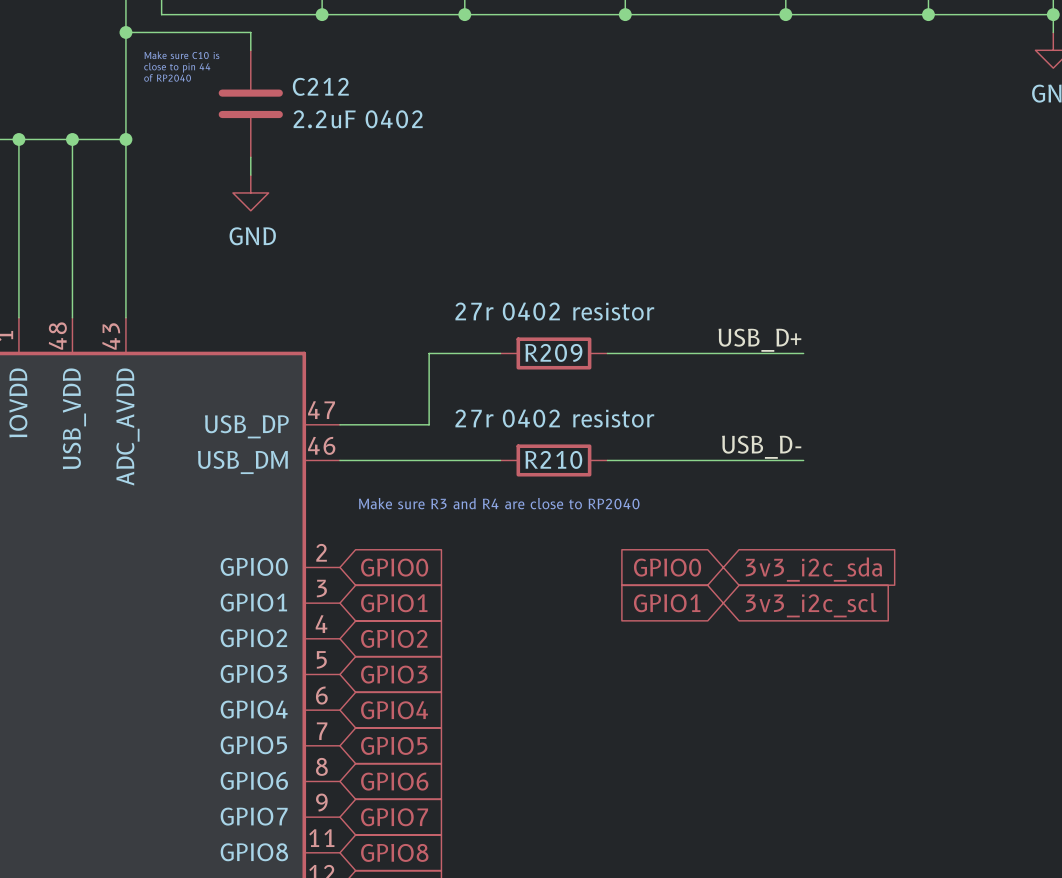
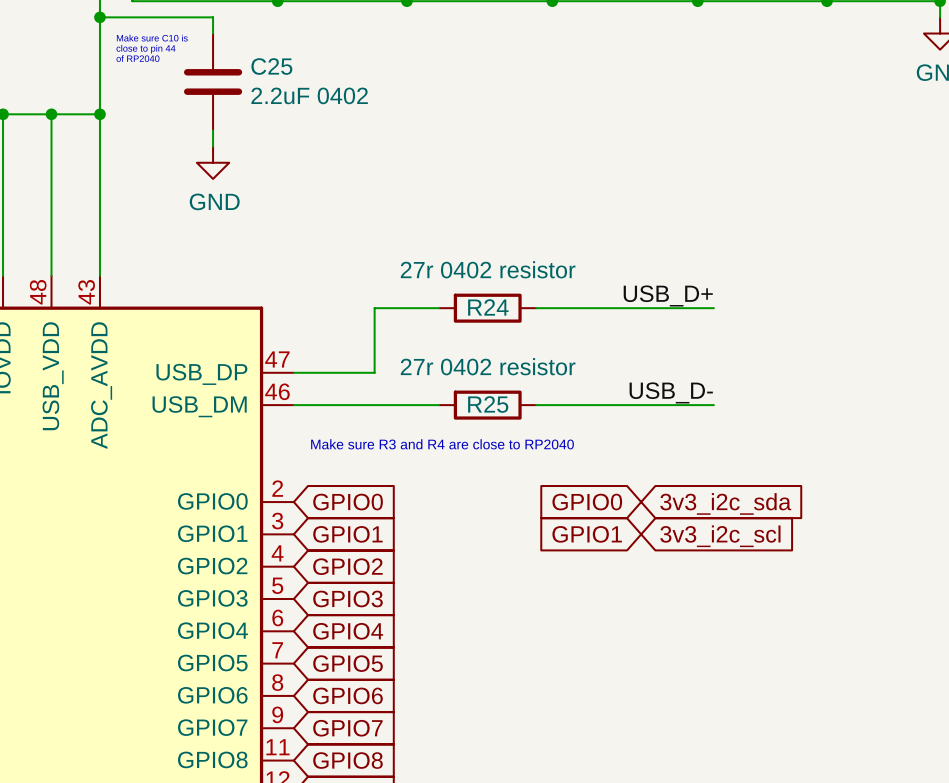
C212 name: C212 (320, 86) -> C25 (271, 66)
R209 name: R209 (553, 352) -> R24 (488, 307)
R210 name: R210 (553, 459) -> R25 (488, 404)

